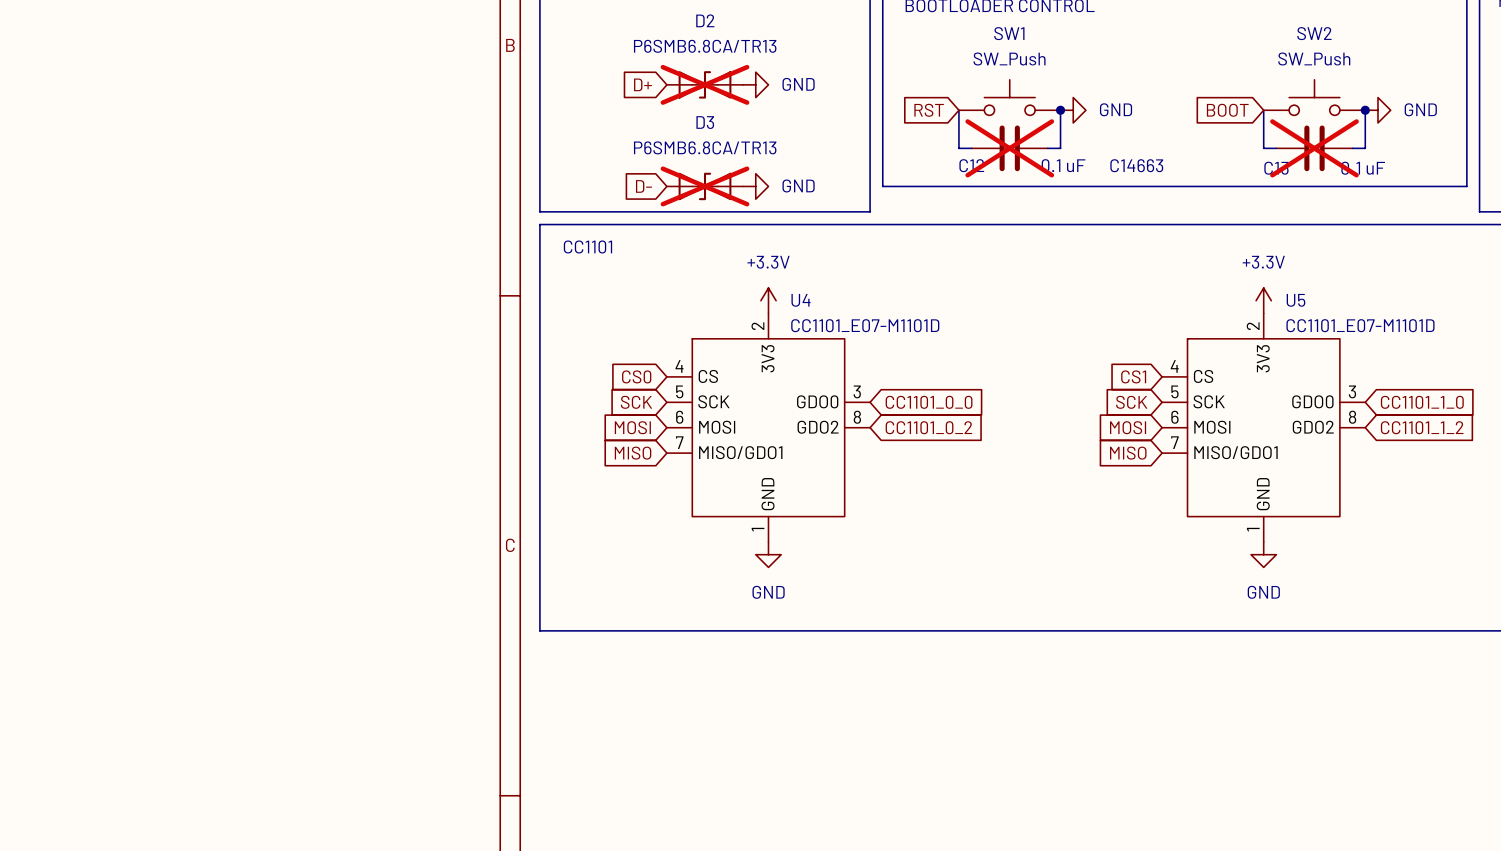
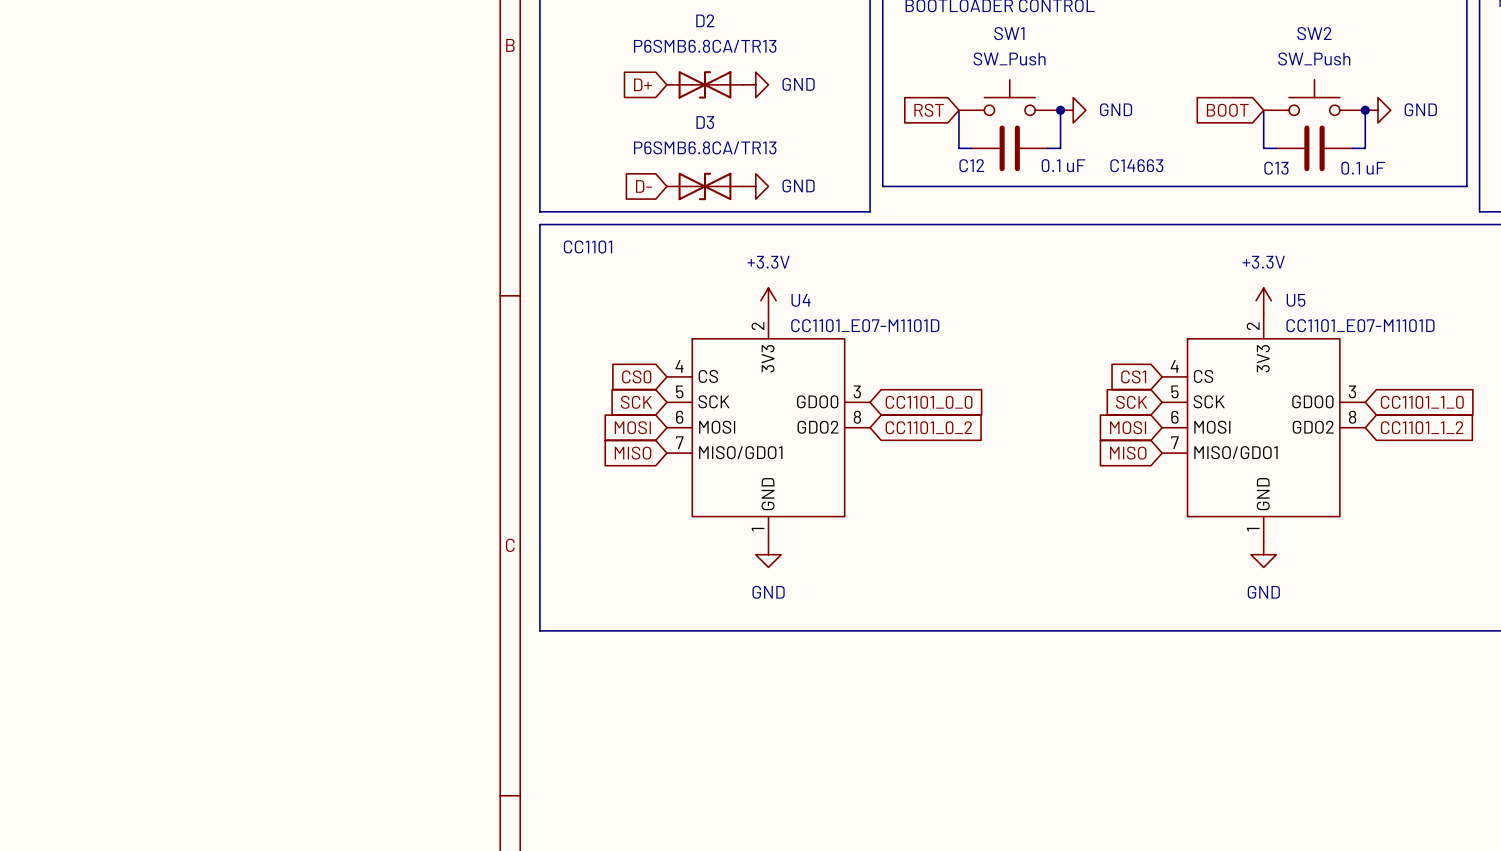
D2 do-not-place cross: (704, 84) -> none
C12 do-not-place cross: (1009, 148) -> none
C13 do-not-place cross: (1314, 148) -> none
D3 do-not-place cross: (704, 186) -> none

